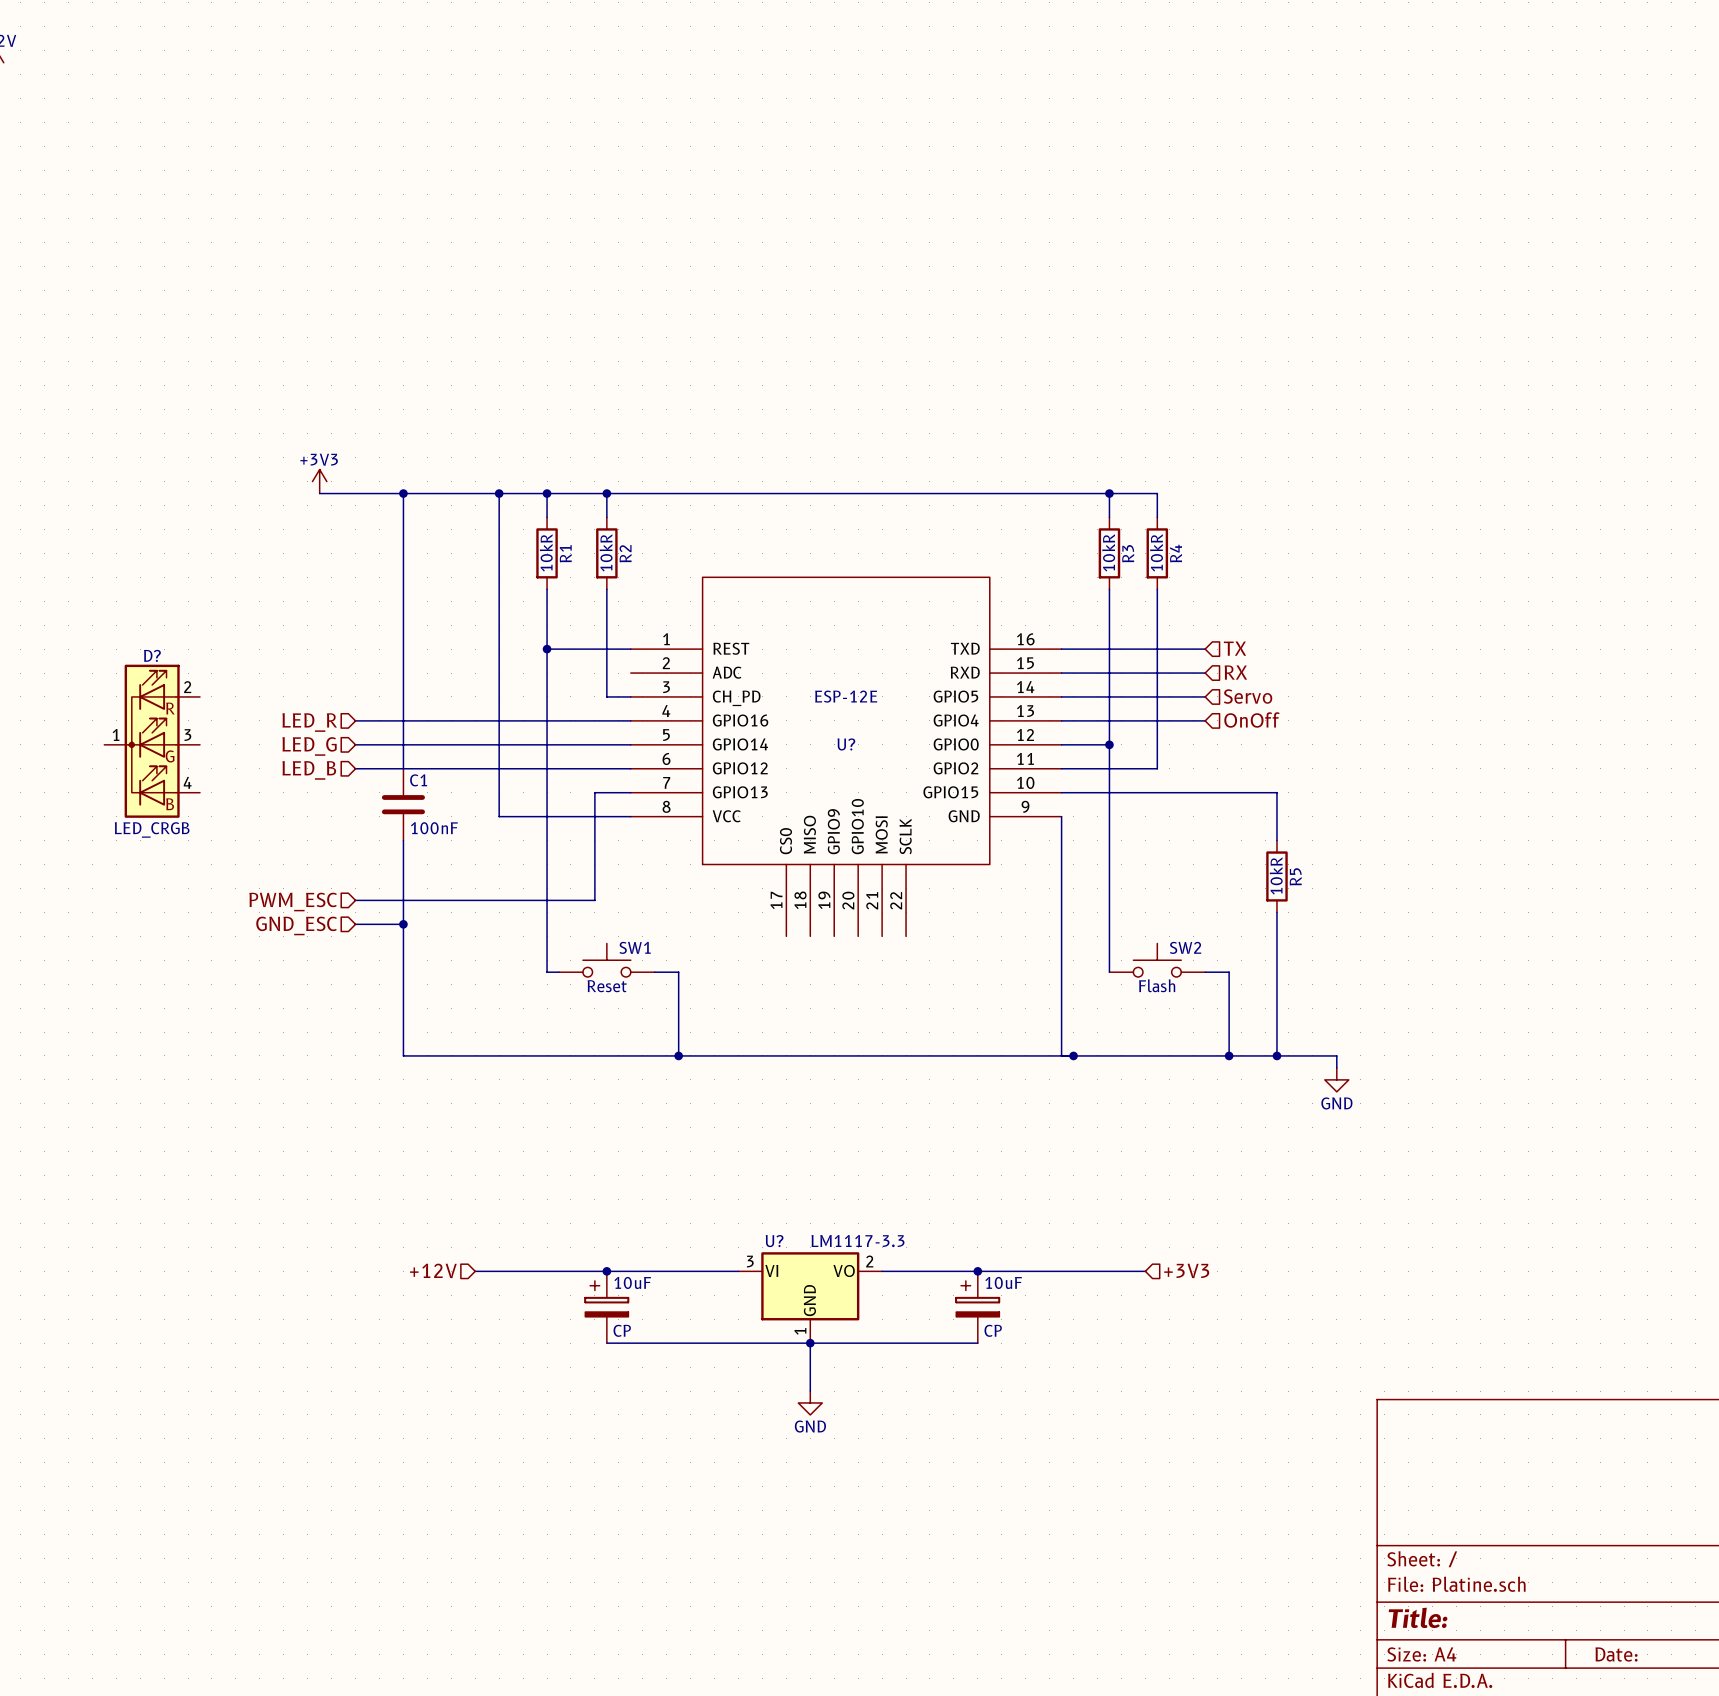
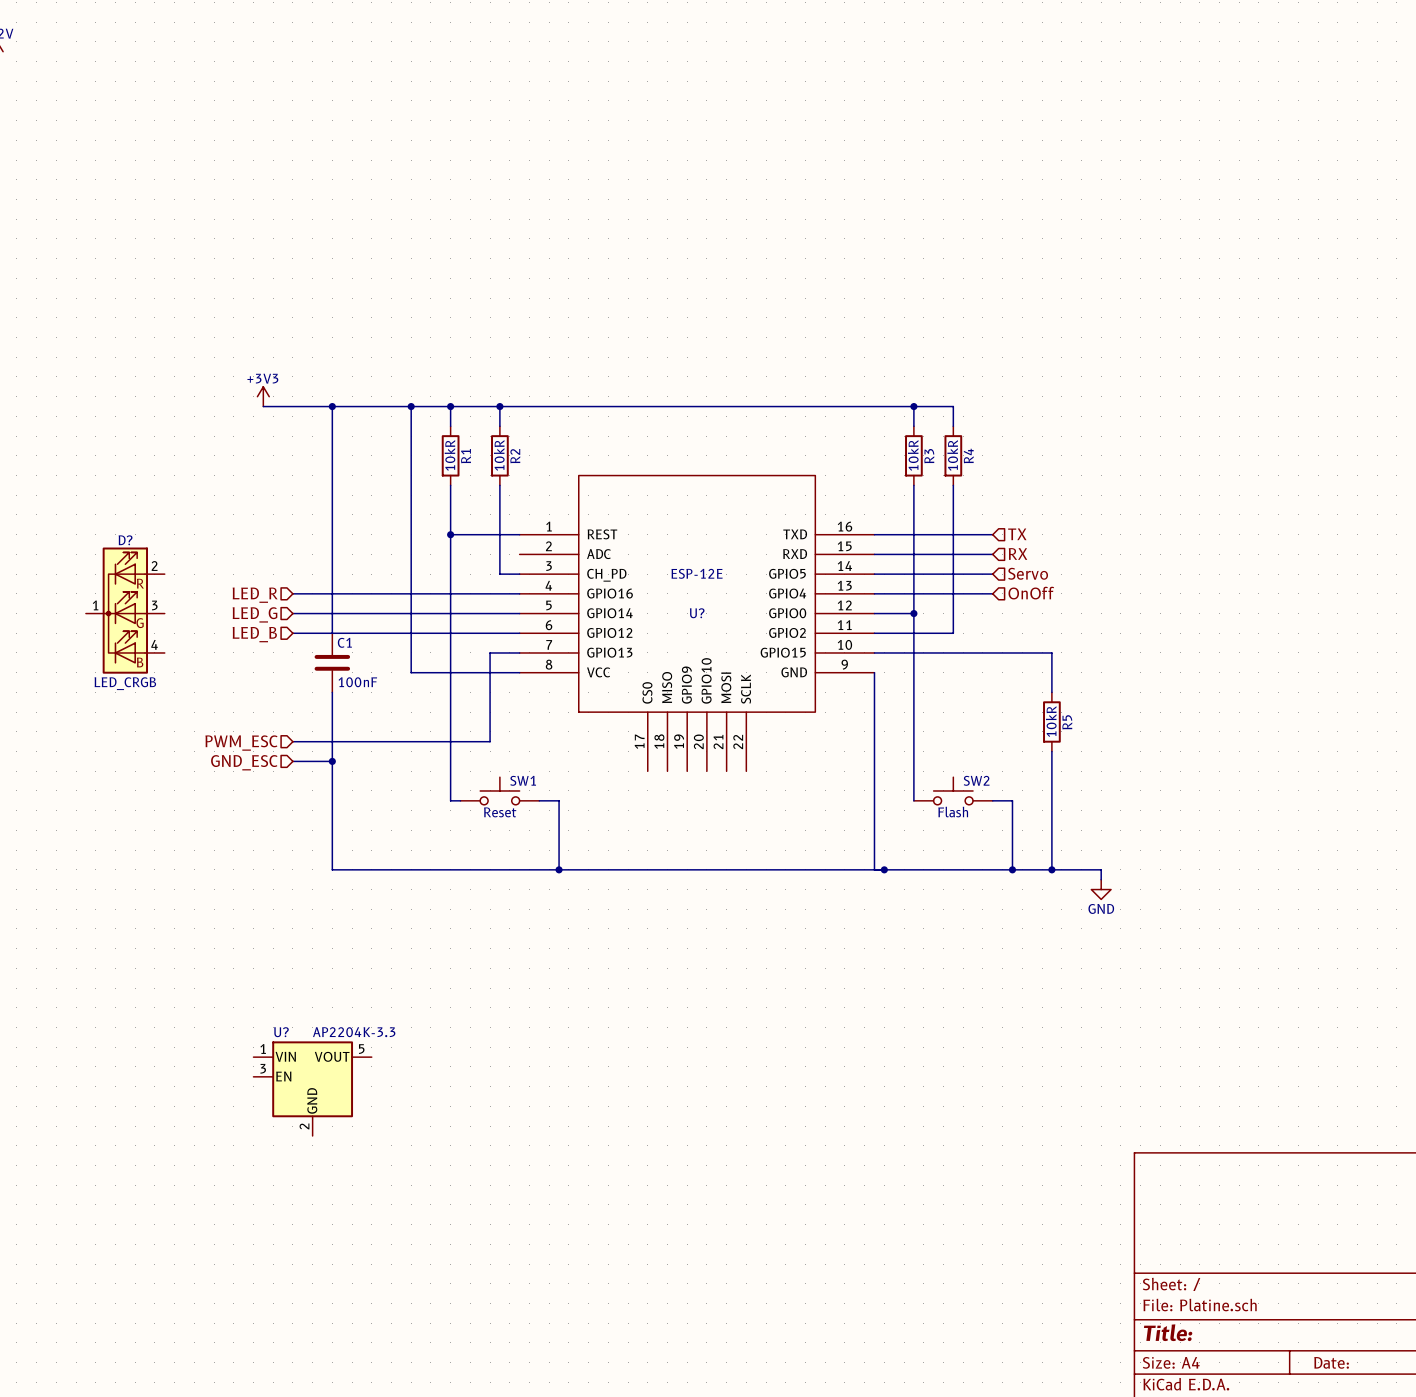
hierarchical label: +12V (433, 1270) -> none
hierarchical label: +3V3 (1186, 1270) -> none
wire: (475, 1271) (738, 1271) -> none
junction: (606, 1271) -> none
wire: (882, 1271) (1145, 1271) -> none
junction: (977, 1271) -> none
U?: LM1117-3.3 (810, 1297) -> none
10uF: CP (606, 1307) -> none
10uF: CP (977, 1307) -> none
U?: none -> AP2204K-3.3 (312, 1088)
wire: (606, 1343) (977, 1343) -> none
wire: (810, 1343) (810, 1391) -> none
junction: (810, 1343) -> none
power symbol: GND (810, 1402) -> none

